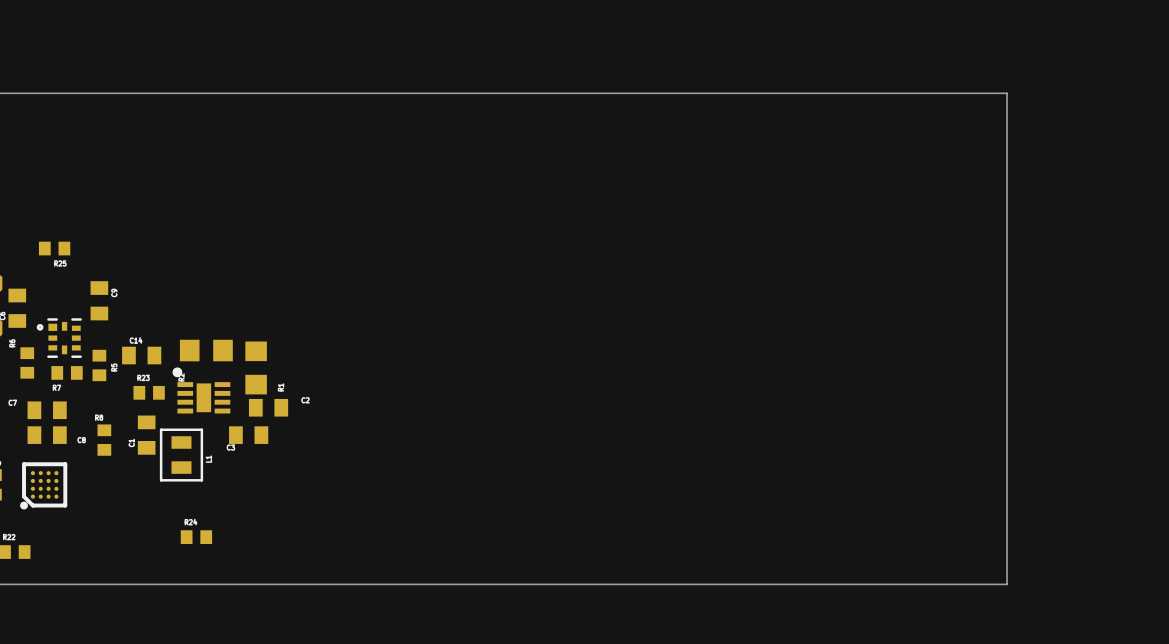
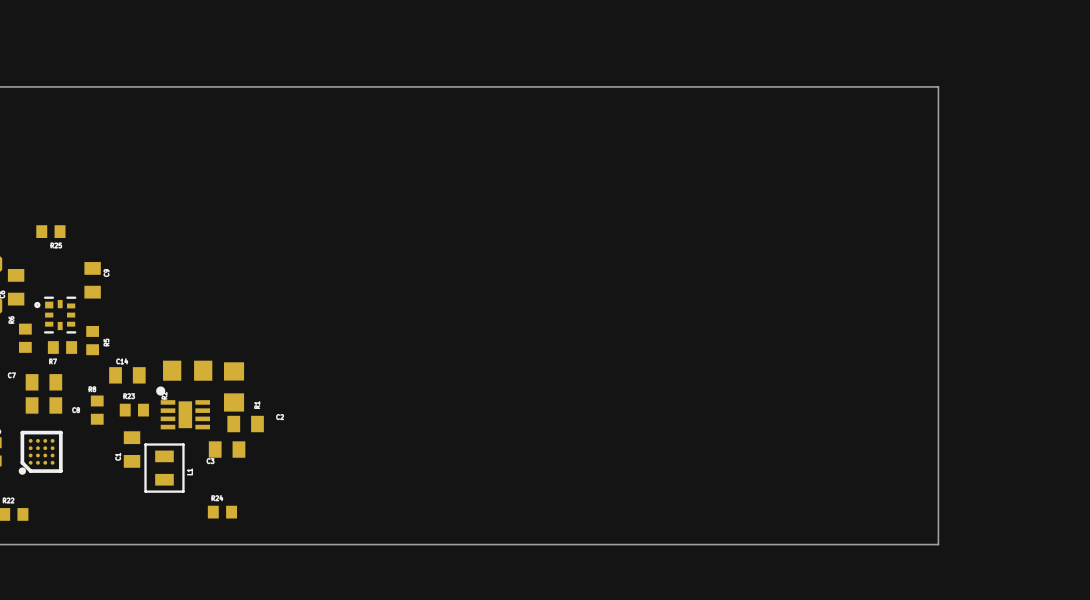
part position: (206, 350) -> (187, 370)
part position: (141, 355) -> (127, 375)
part position: (256, 367) -> (234, 386)
part position: (201, 390) -> (183, 407)
part position: (149, 392) -> (134, 410)
part position: (268, 407) -> (245, 424)
part position: (146, 435) -> (132, 449)
part position: (248, 435) -> (227, 449)
part position: (181, 455) -> (164, 468)
part position: (196, 537) -> (222, 512)

